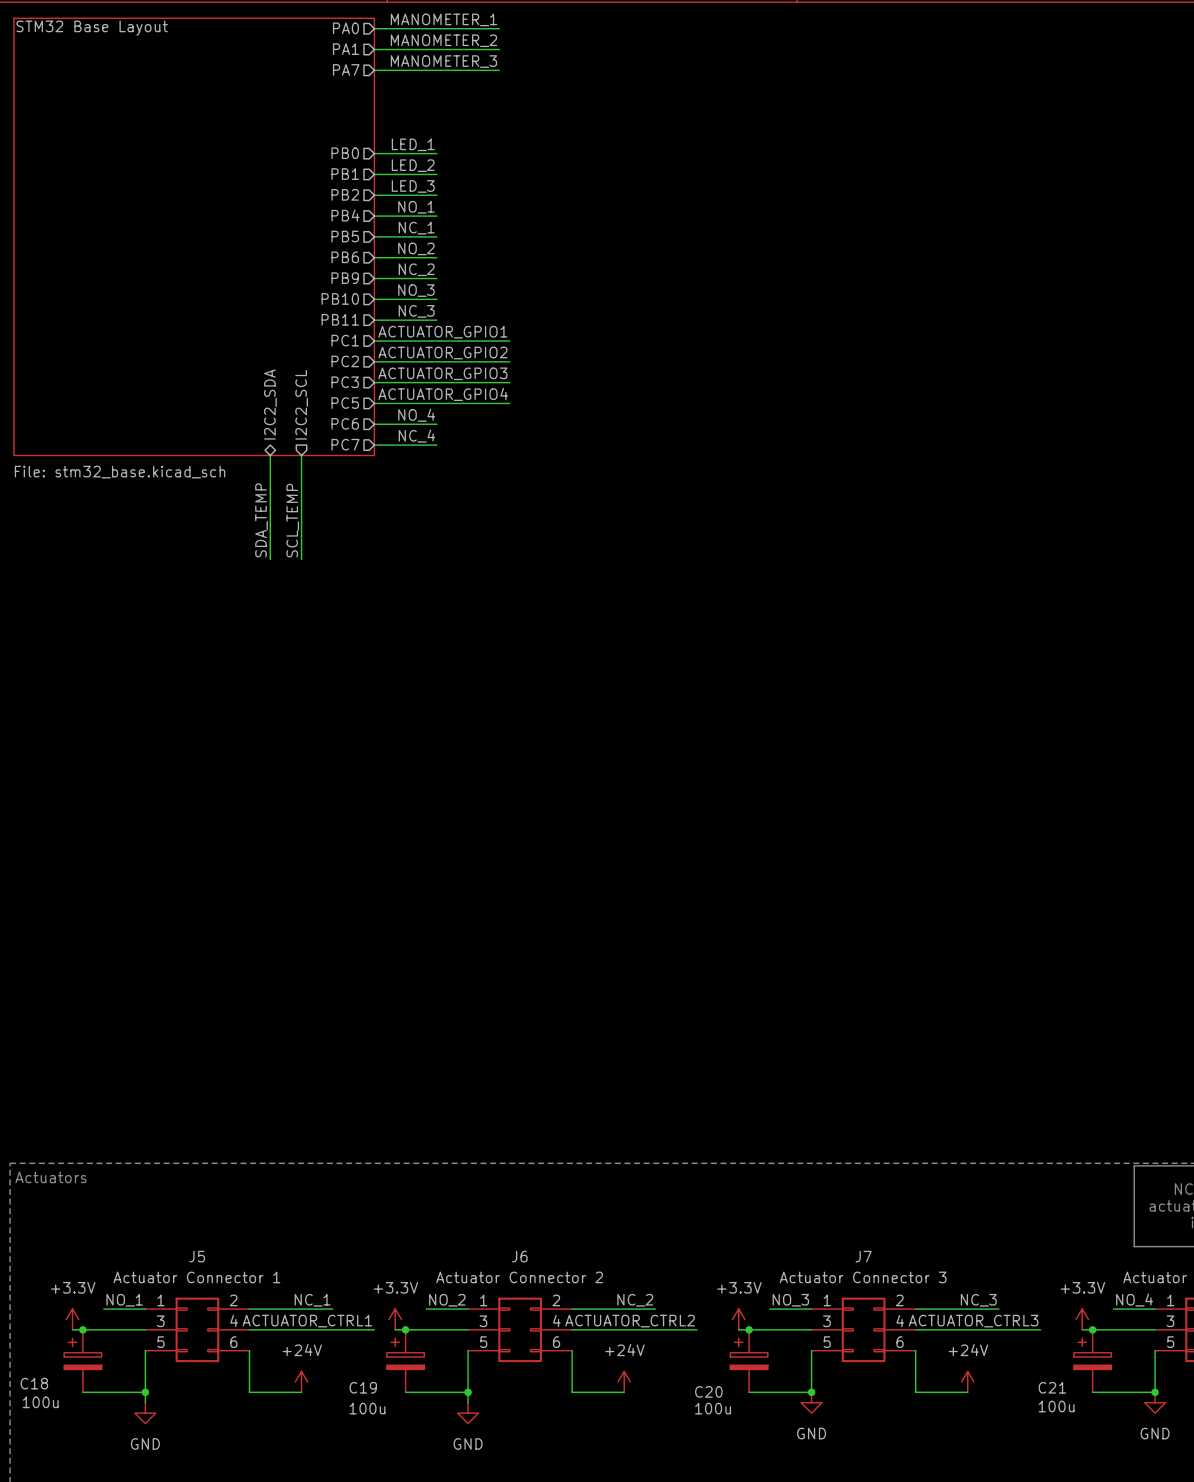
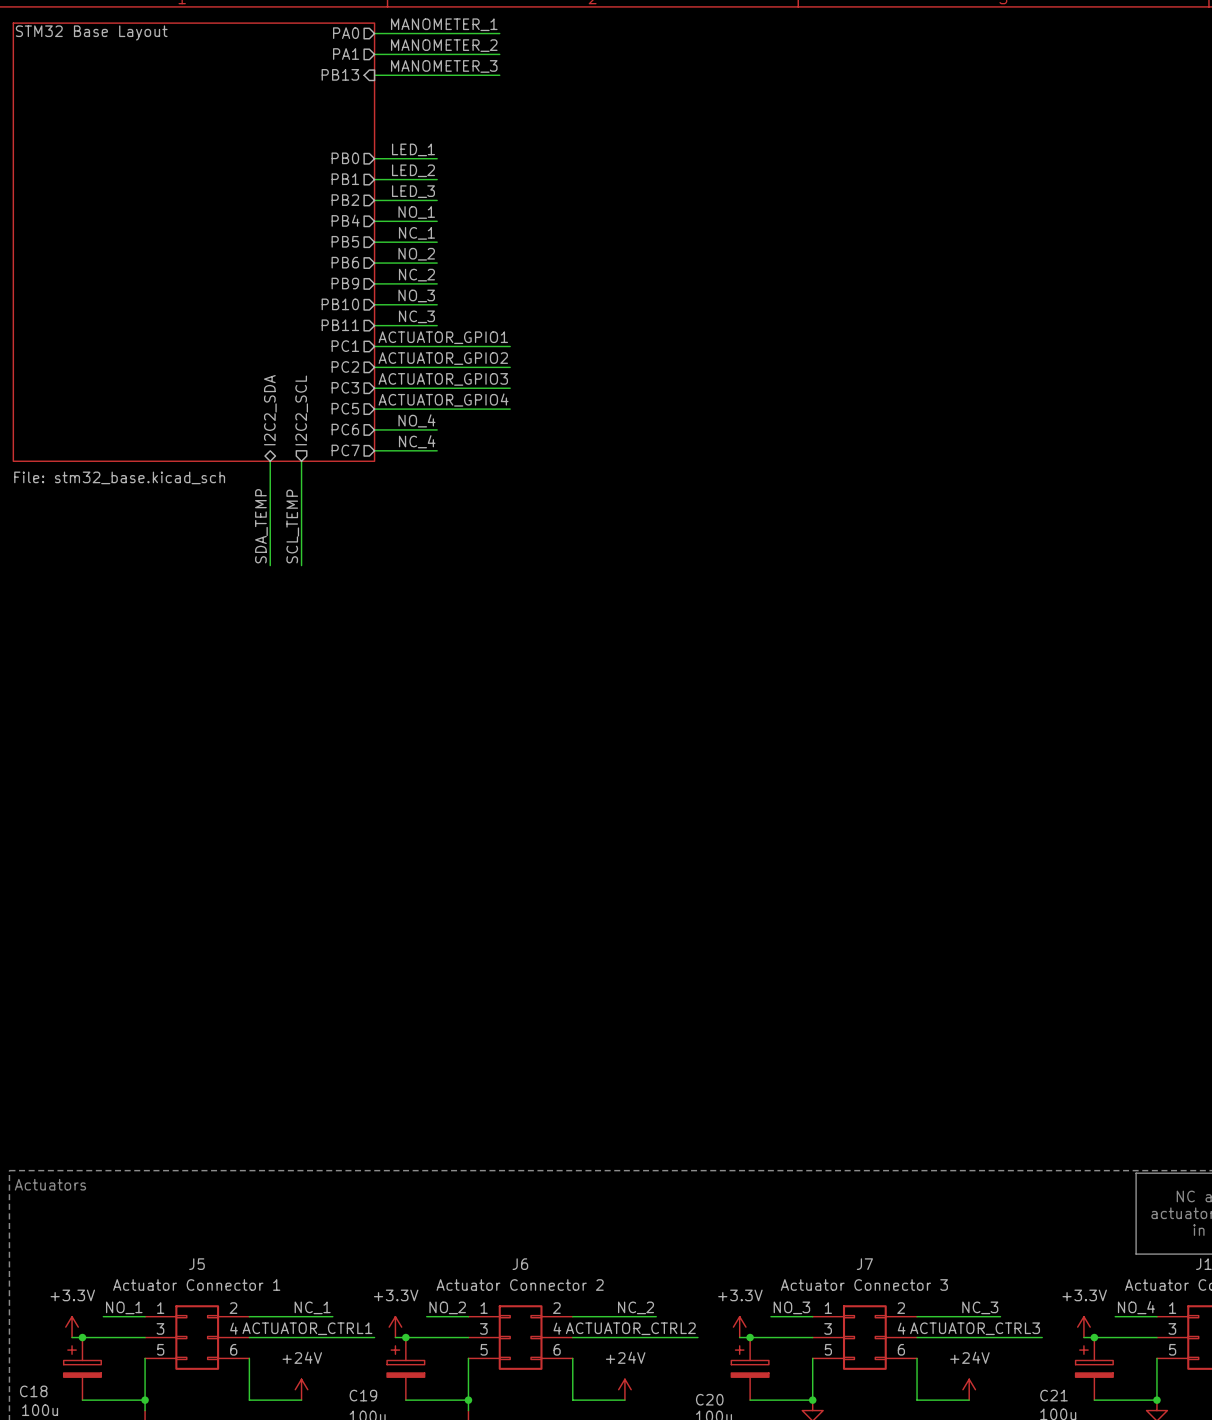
sheet pin shape: output (346, 69) -> input (340, 74)
sheet pin: PA7 (346, 69) -> PB13 (340, 74)

